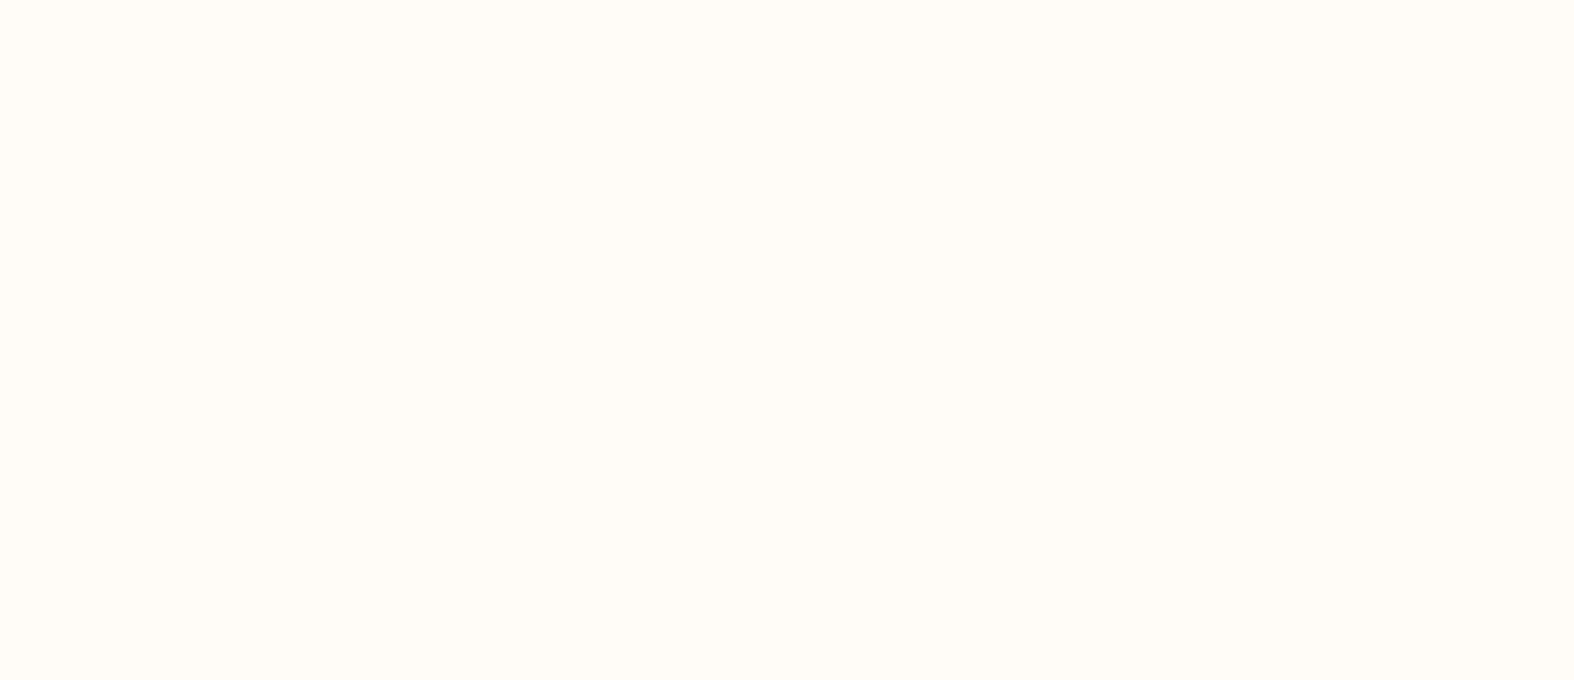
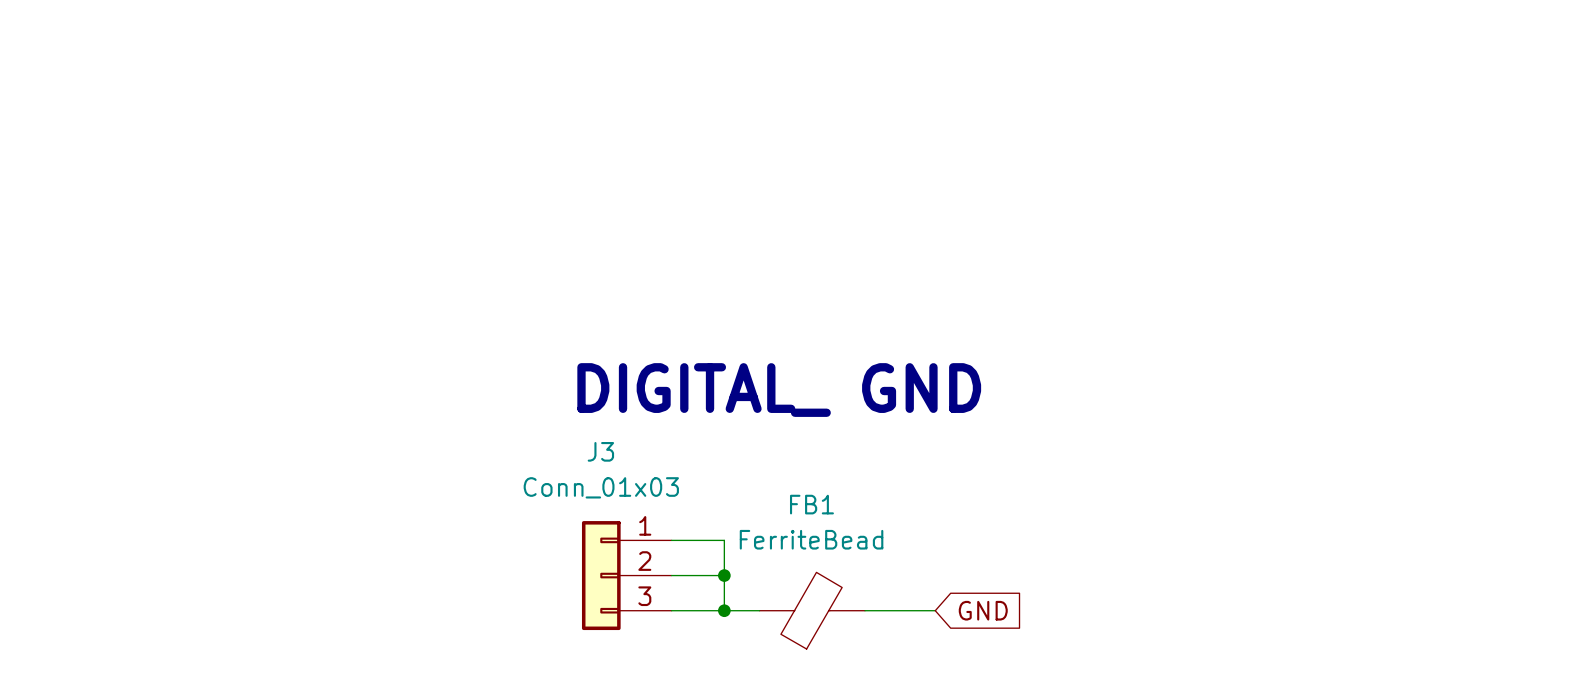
text: none -> DIGITAL_ GND (779, 390)
wire: none -> (671, 540) (724, 540) (724, 610)
J3: none -> Conn_01x03 (626, 575)
wire: none -> (671, 575) (724, 575)
junction: none -> (724, 575)
wire: none -> (671, 610) (759, 610)
junction: none -> (724, 610)
FB1: none -> FerriteBead (812, 610)
wire: none -> (864, 610) (935, 610)
global label: none -> GND (983, 610)

